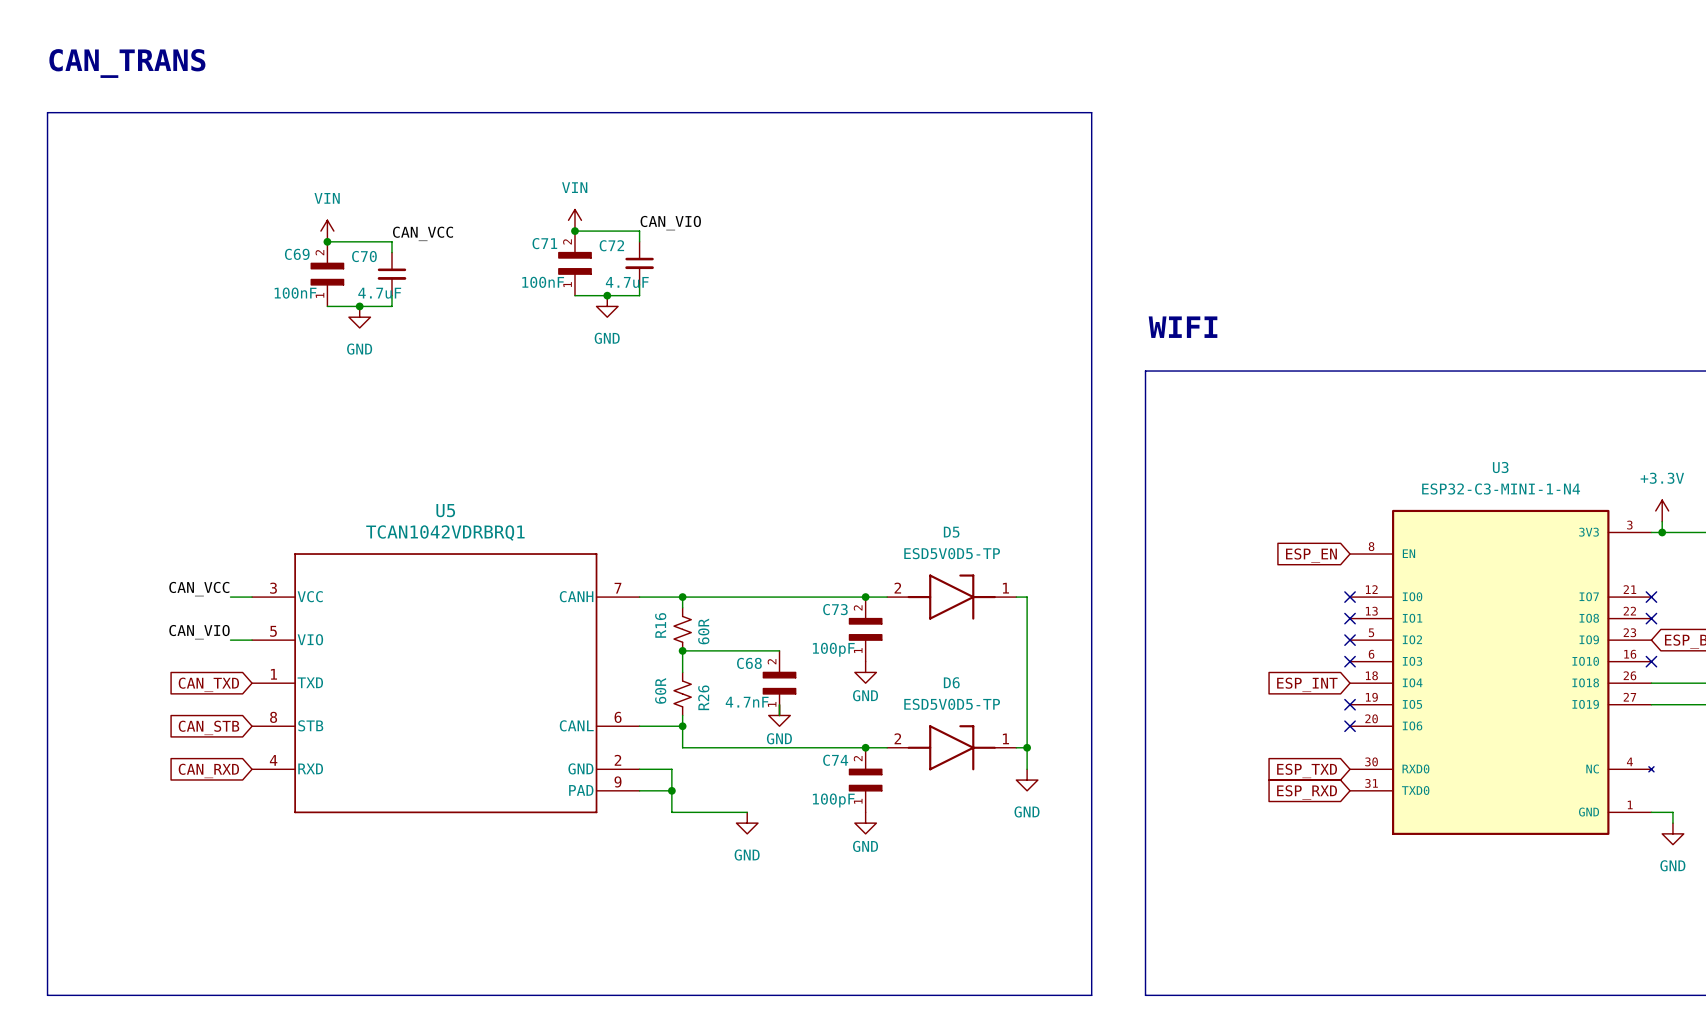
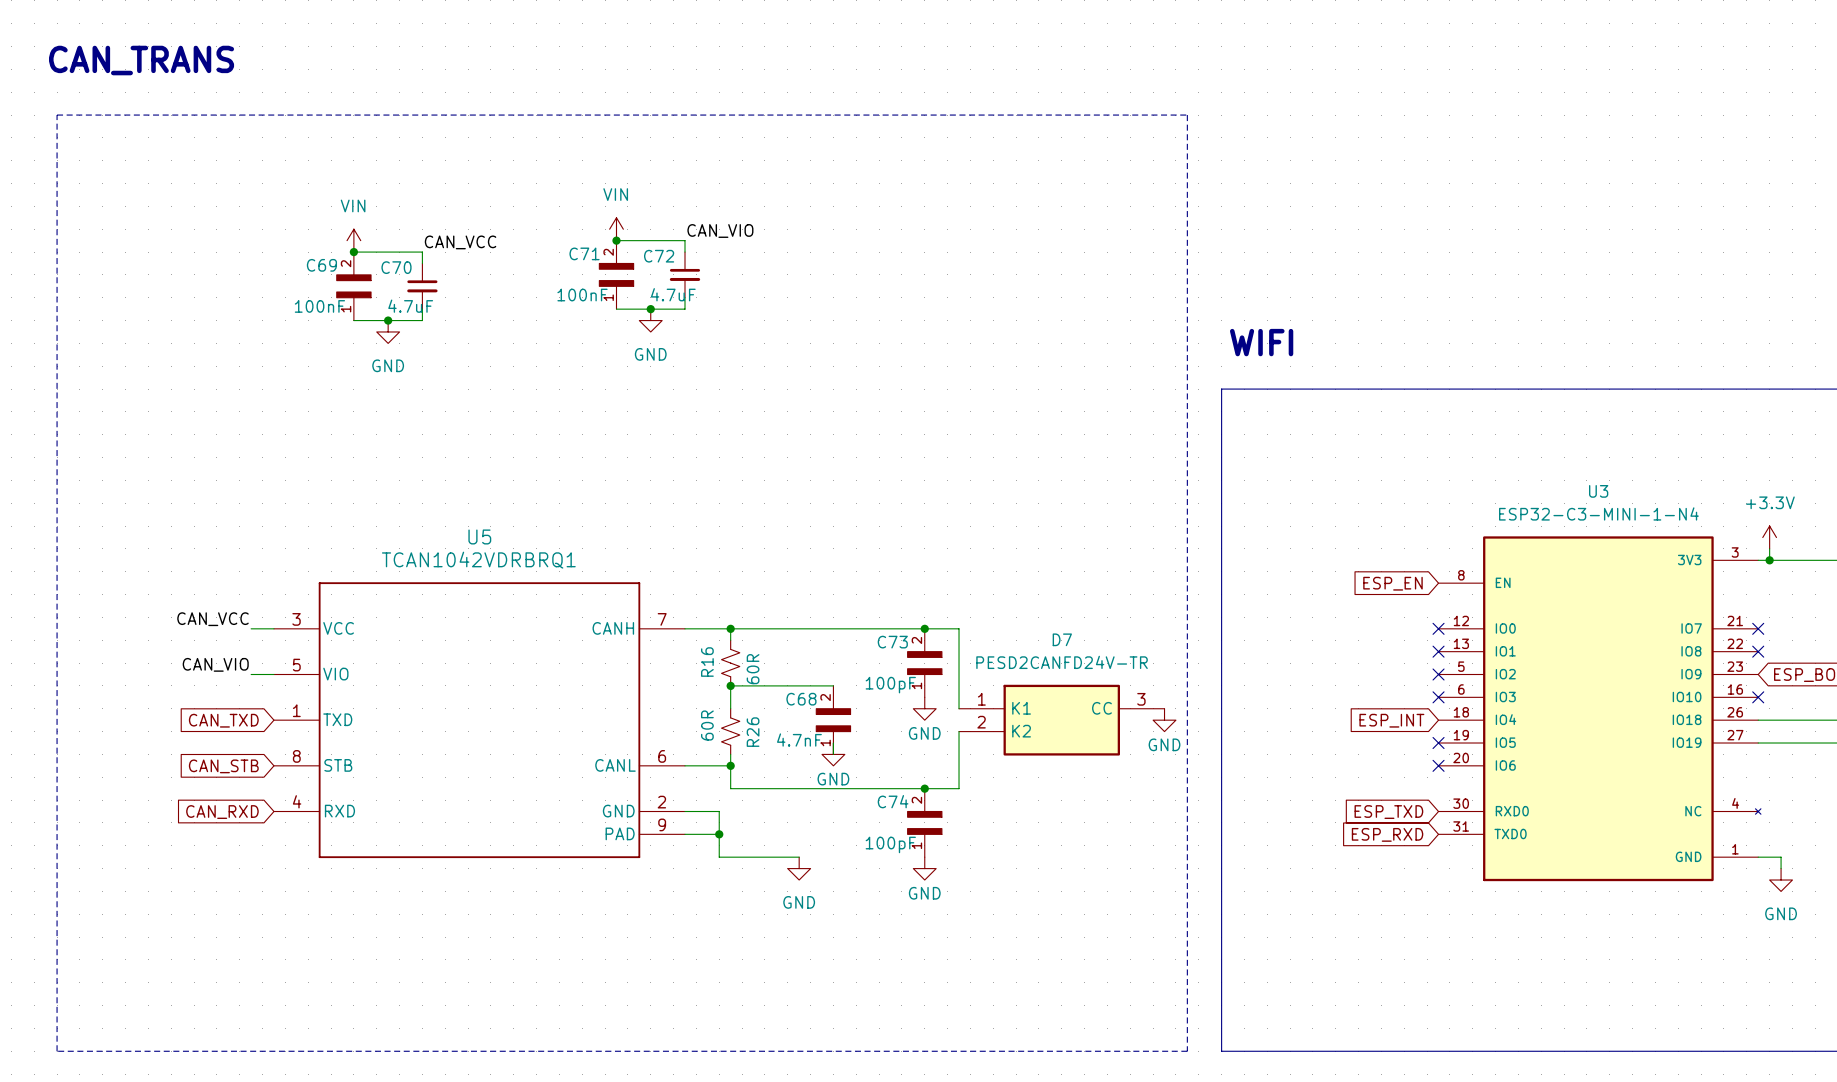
line: (47, 112) (1091, 112) (1091, 995) (47, 995) (47, 112) -> (57, 115) (57, 1051) (1187, 1051) (1187, 115) (57, 115)
wire: none -> (947, 628) (959, 628) (959, 708)
D5: ESD5V0D5-TP (951, 597) -> none
wire: (1016, 597) (1027, 597) (1027, 769) -> none
D7: none -> PESD2CANFD24V-TR (1061, 720)
wire: none -> (959, 731) (959, 788) (947, 788)
D6: ESD5V0D5-TP (951, 747) -> none
wire: (1016, 747) (1027, 747) -> none
junction: (1027, 747) -> none
power symbol position: GND (1027, 780) -> GND (1164, 720)
power symbol text position: GND (1027, 811) -> GND (1164, 744)

